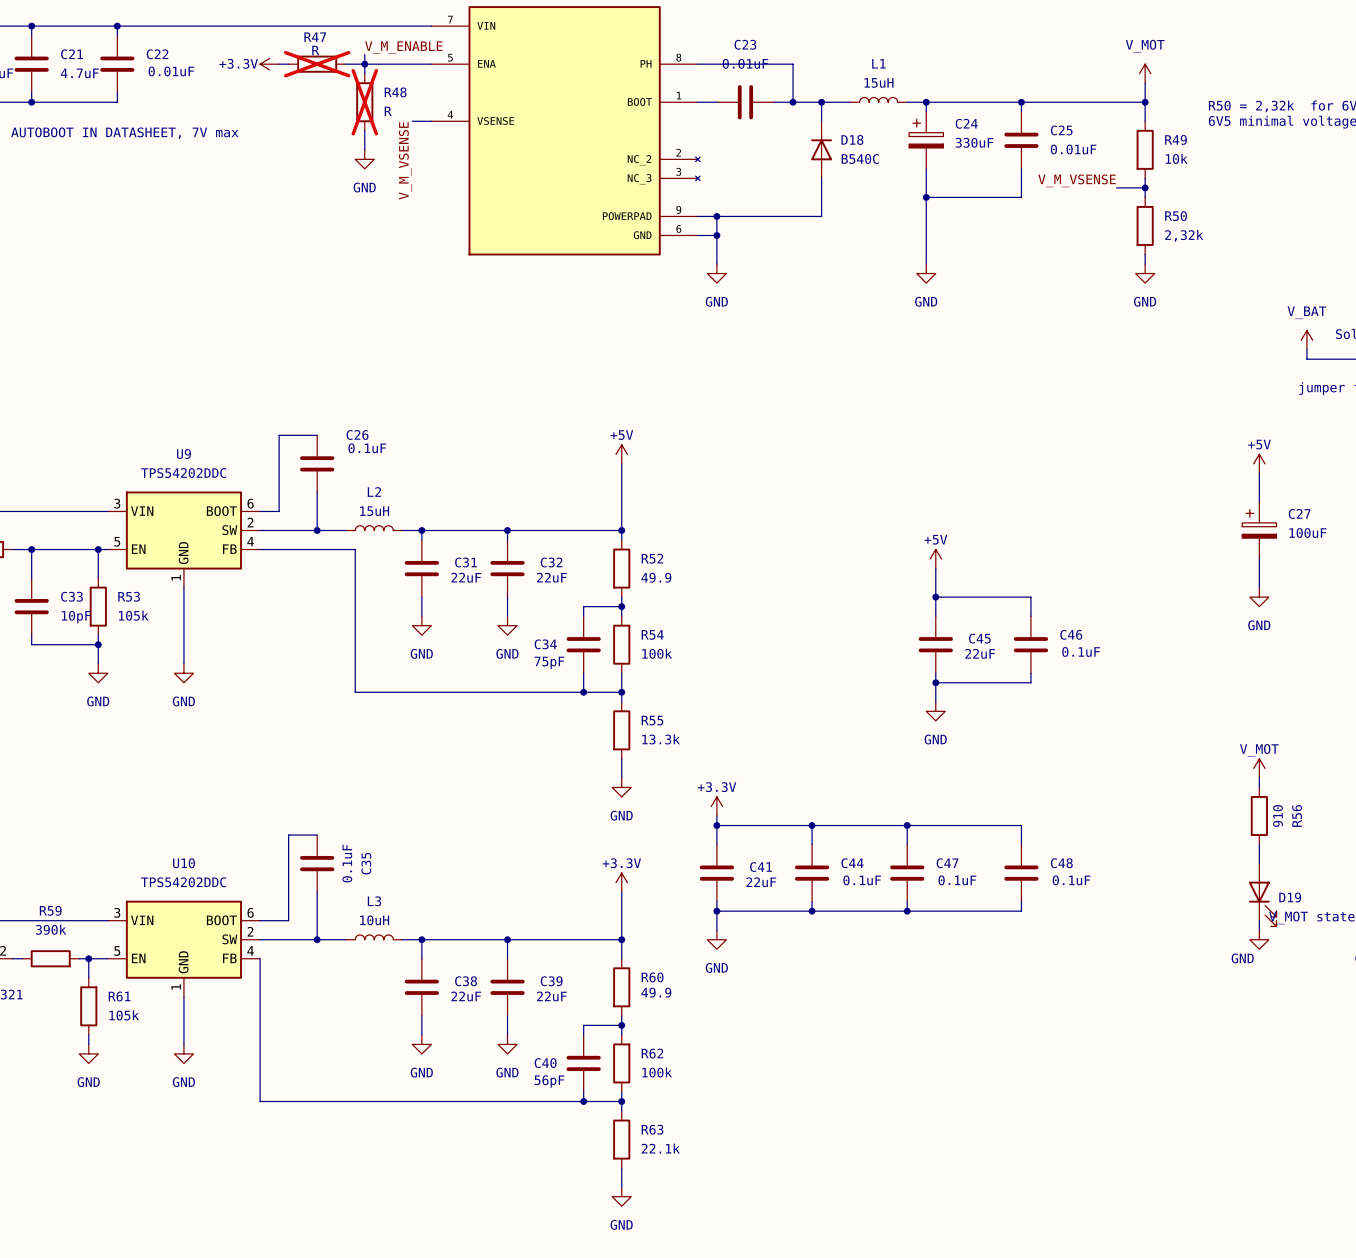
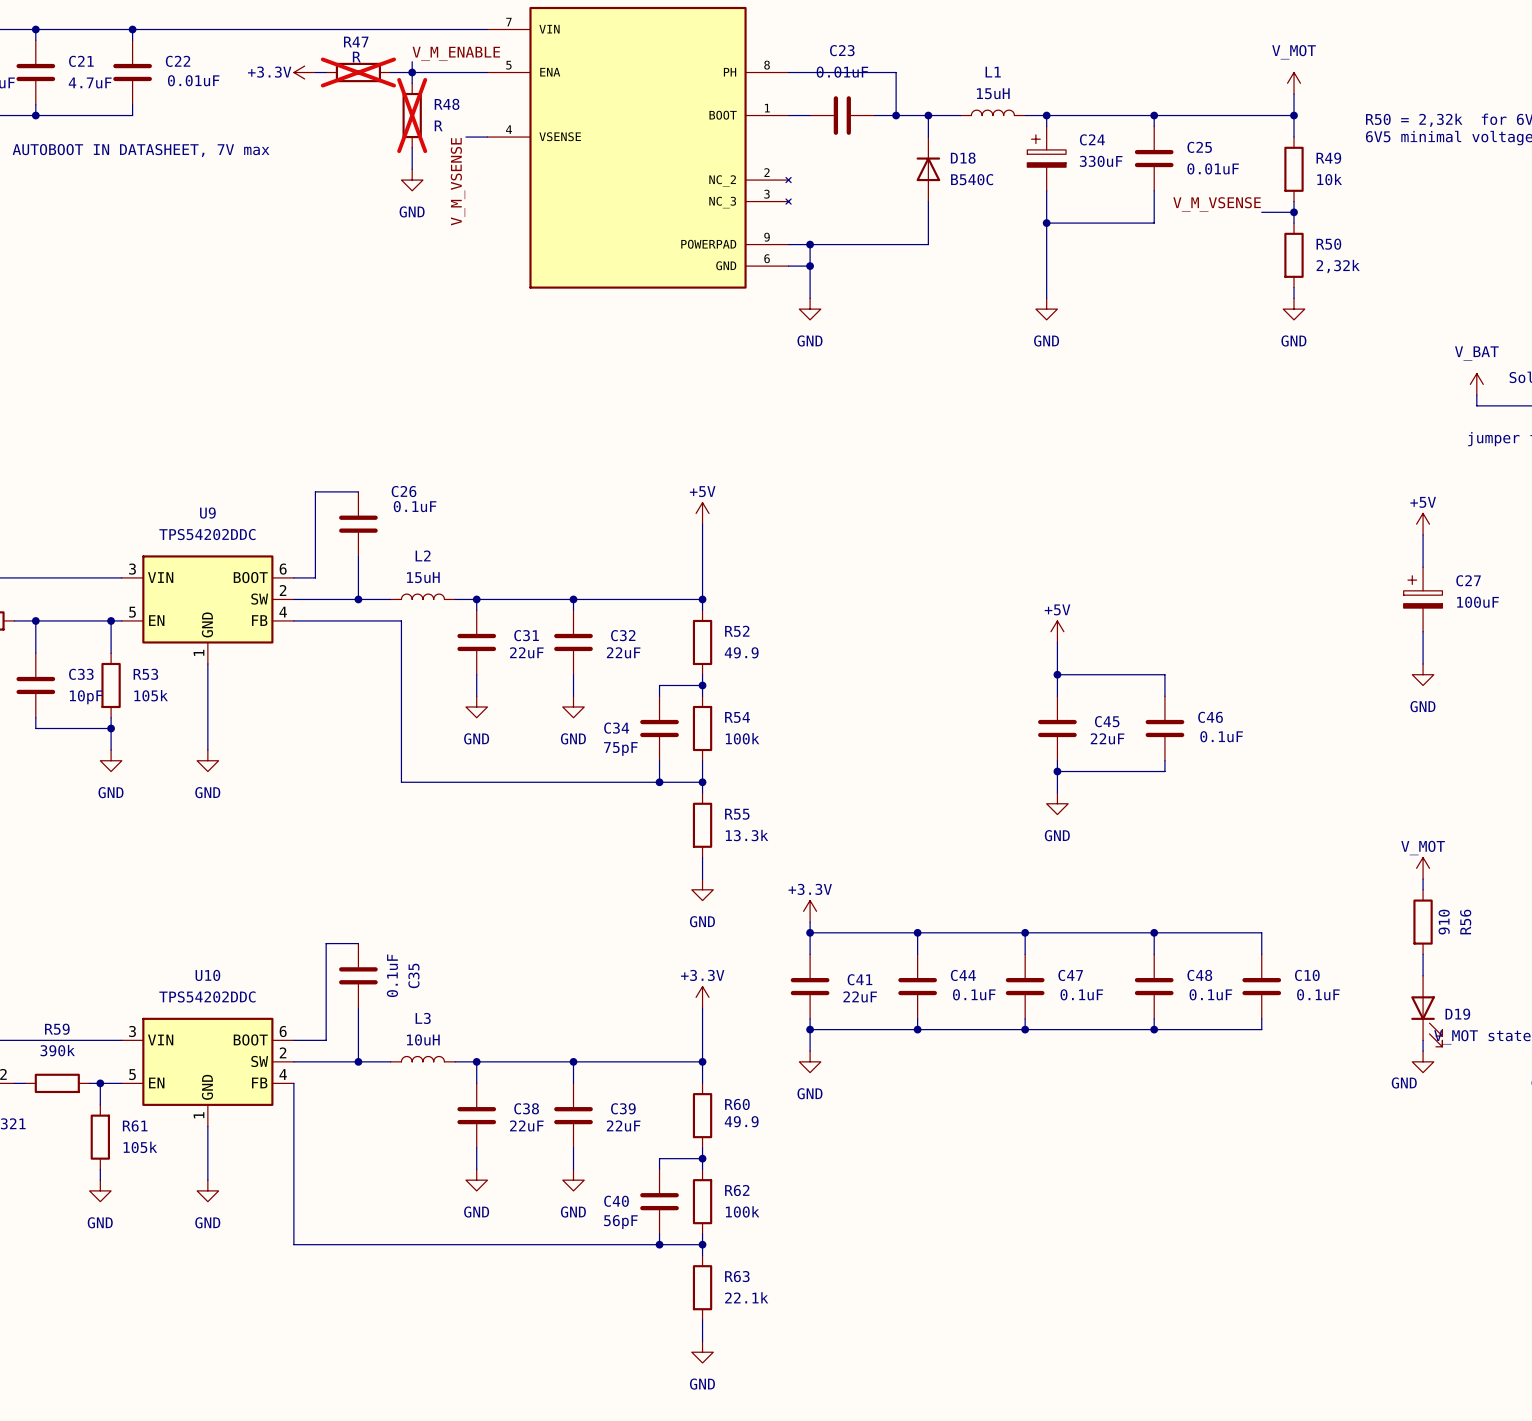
wire: none -> (1154, 932) (1261, 932) (1261, 954)
junction: none -> (1154, 932)
C10: none -> 0.1uF (1261, 986)
wire: none -> (1261, 1018) (1261, 1029) (1154, 1029)
junction: none -> (1154, 1029)

